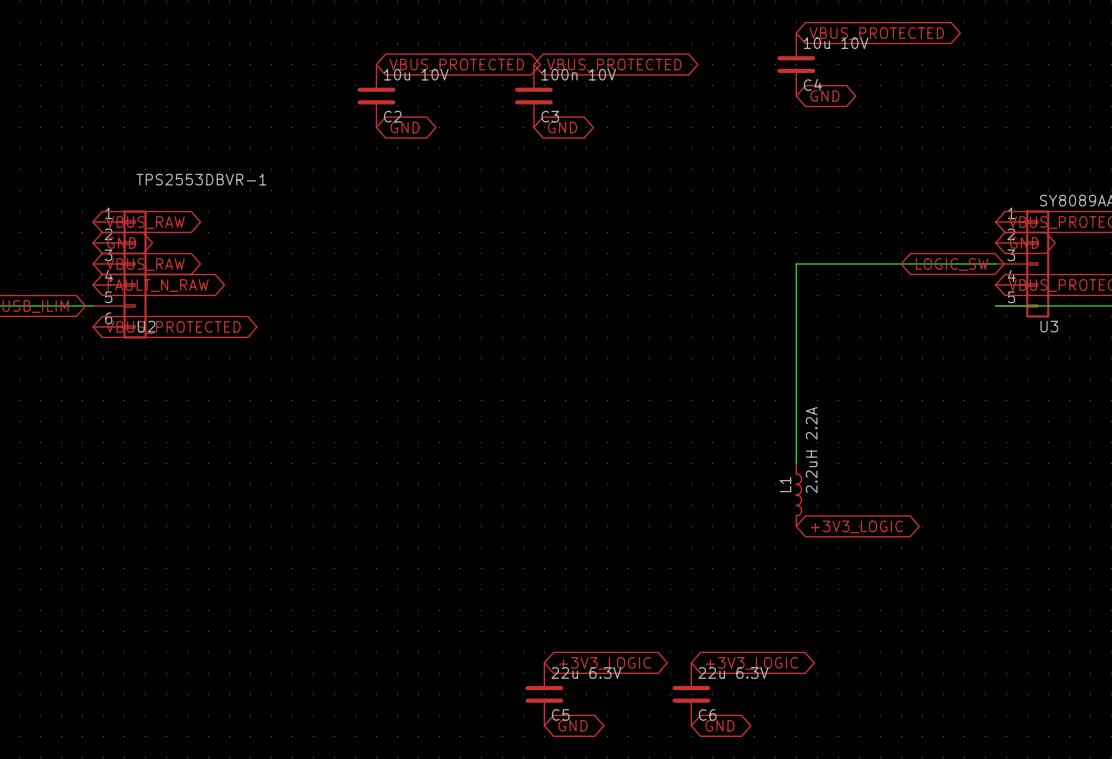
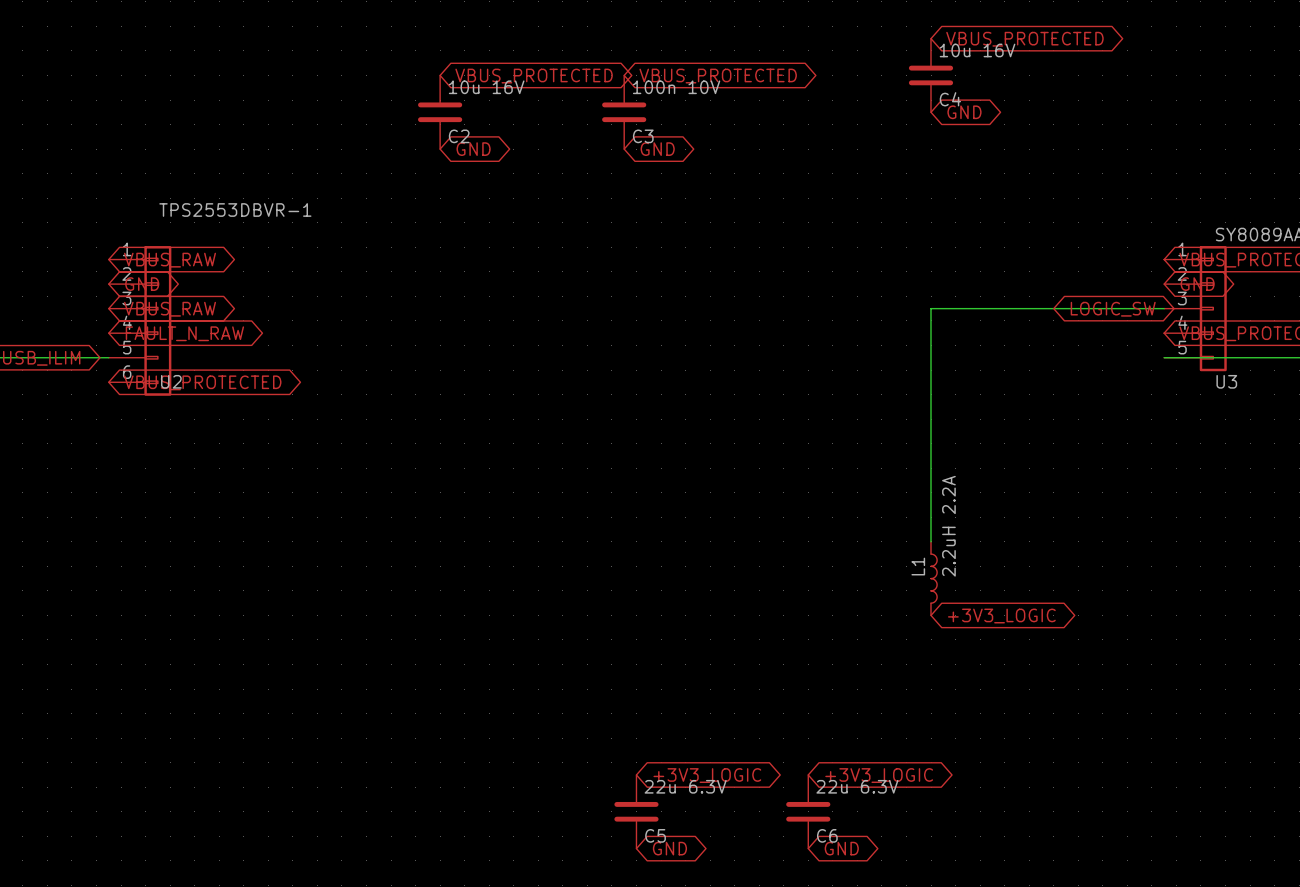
C4 value: 10u 10V (836, 43) -> 10u 16V (977, 50)
C2 value: 10u 10V (416, 74) -> 10u 16V (486, 87)

